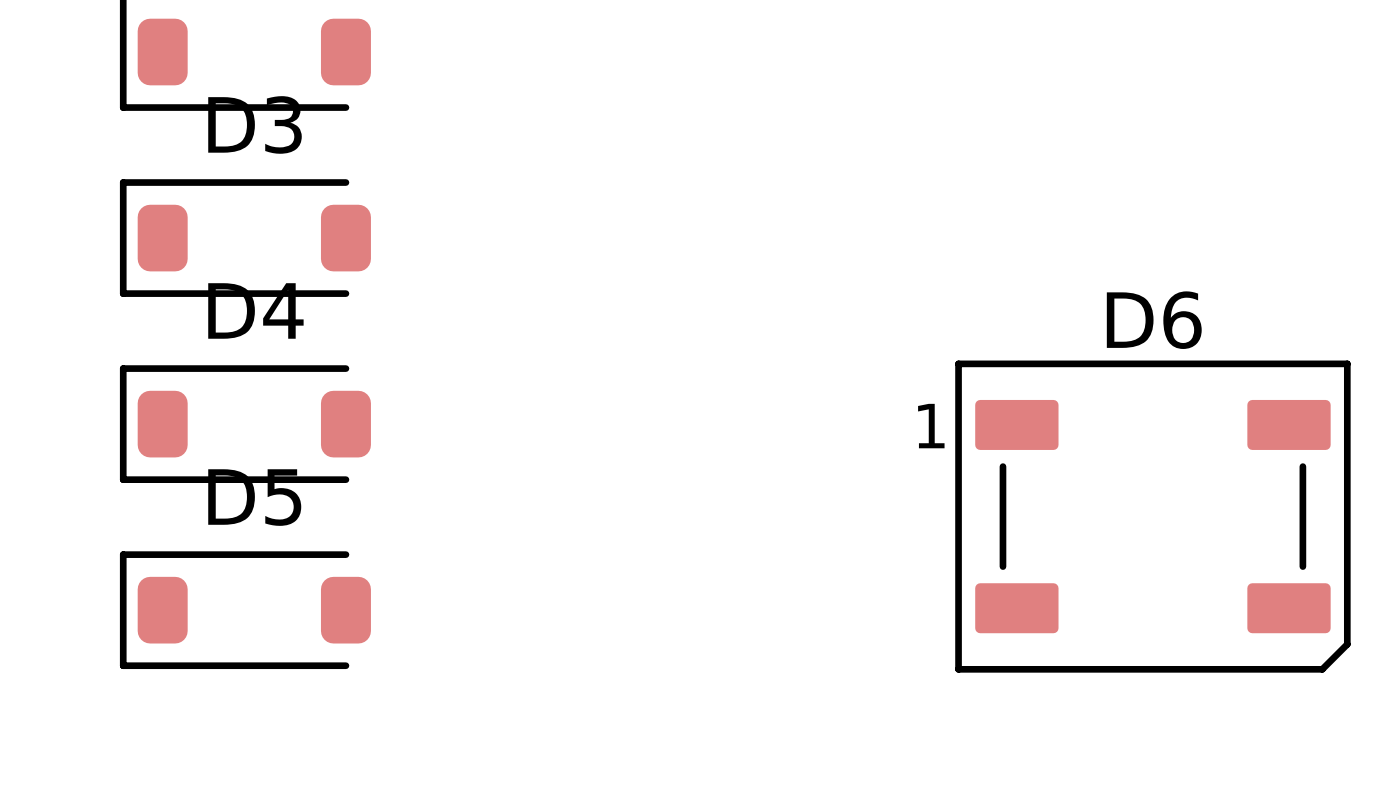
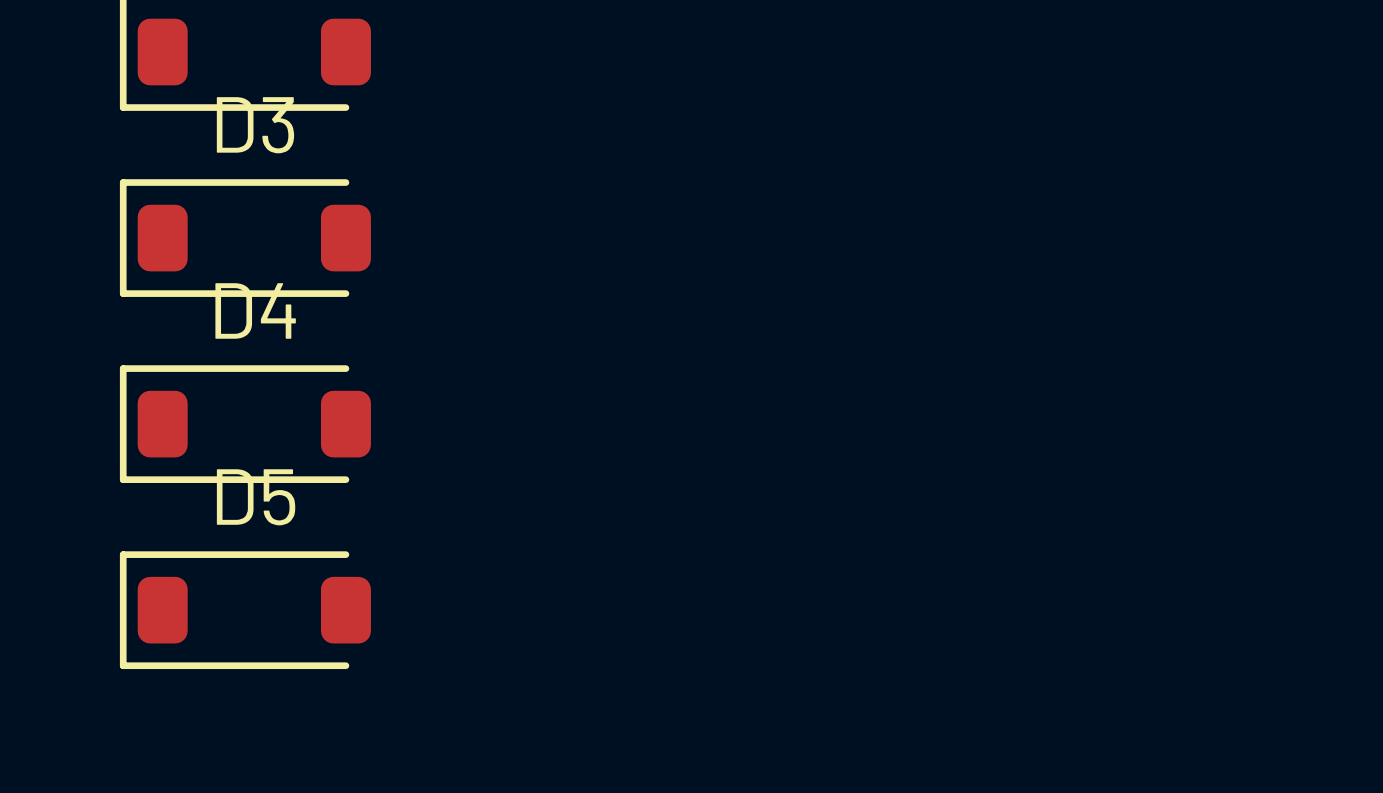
D6: (1152, 516) -> none

